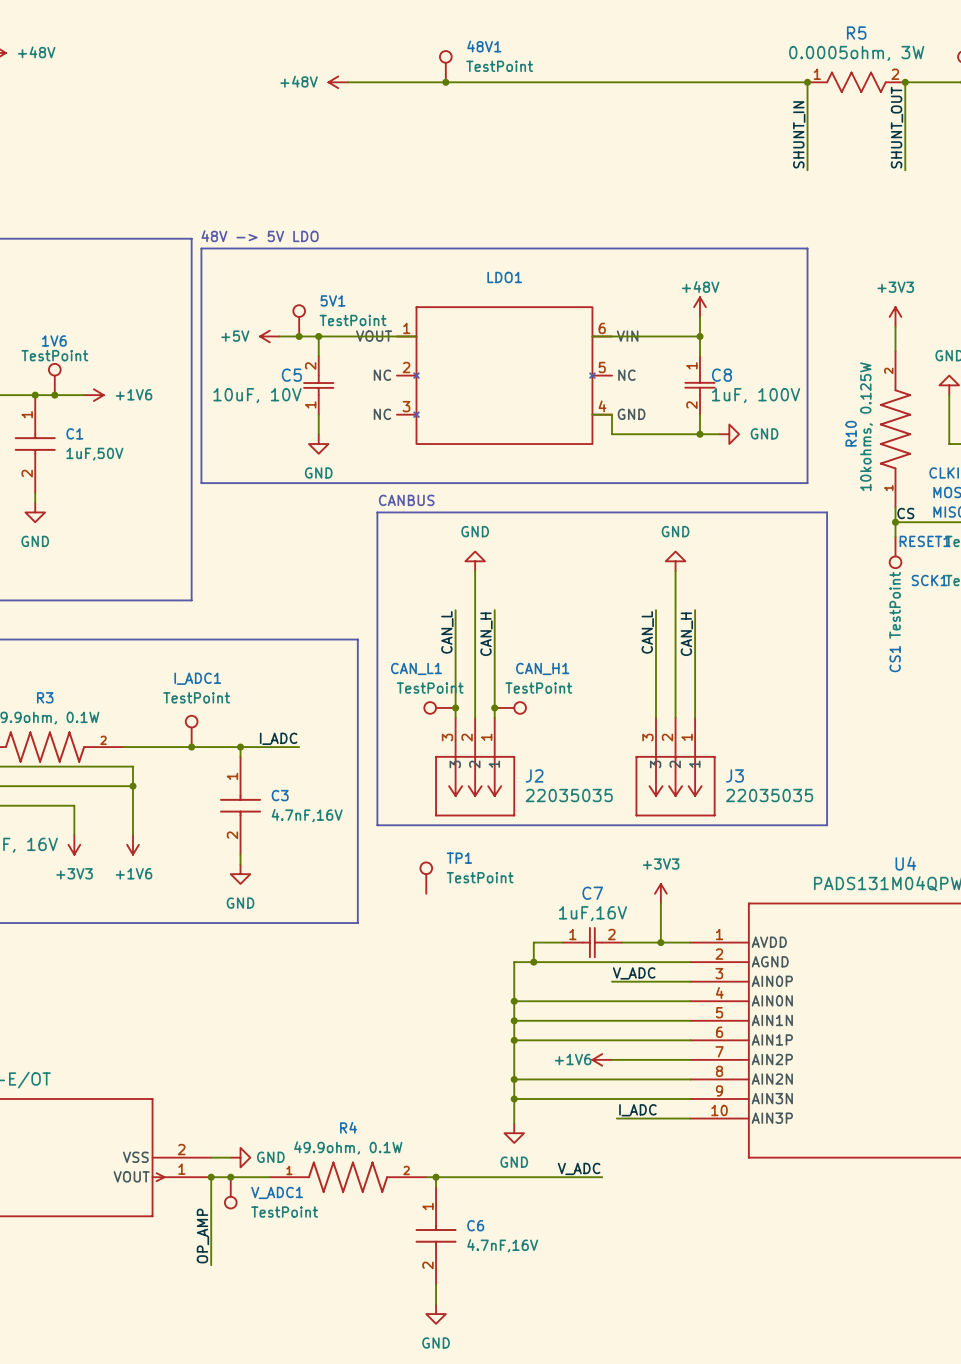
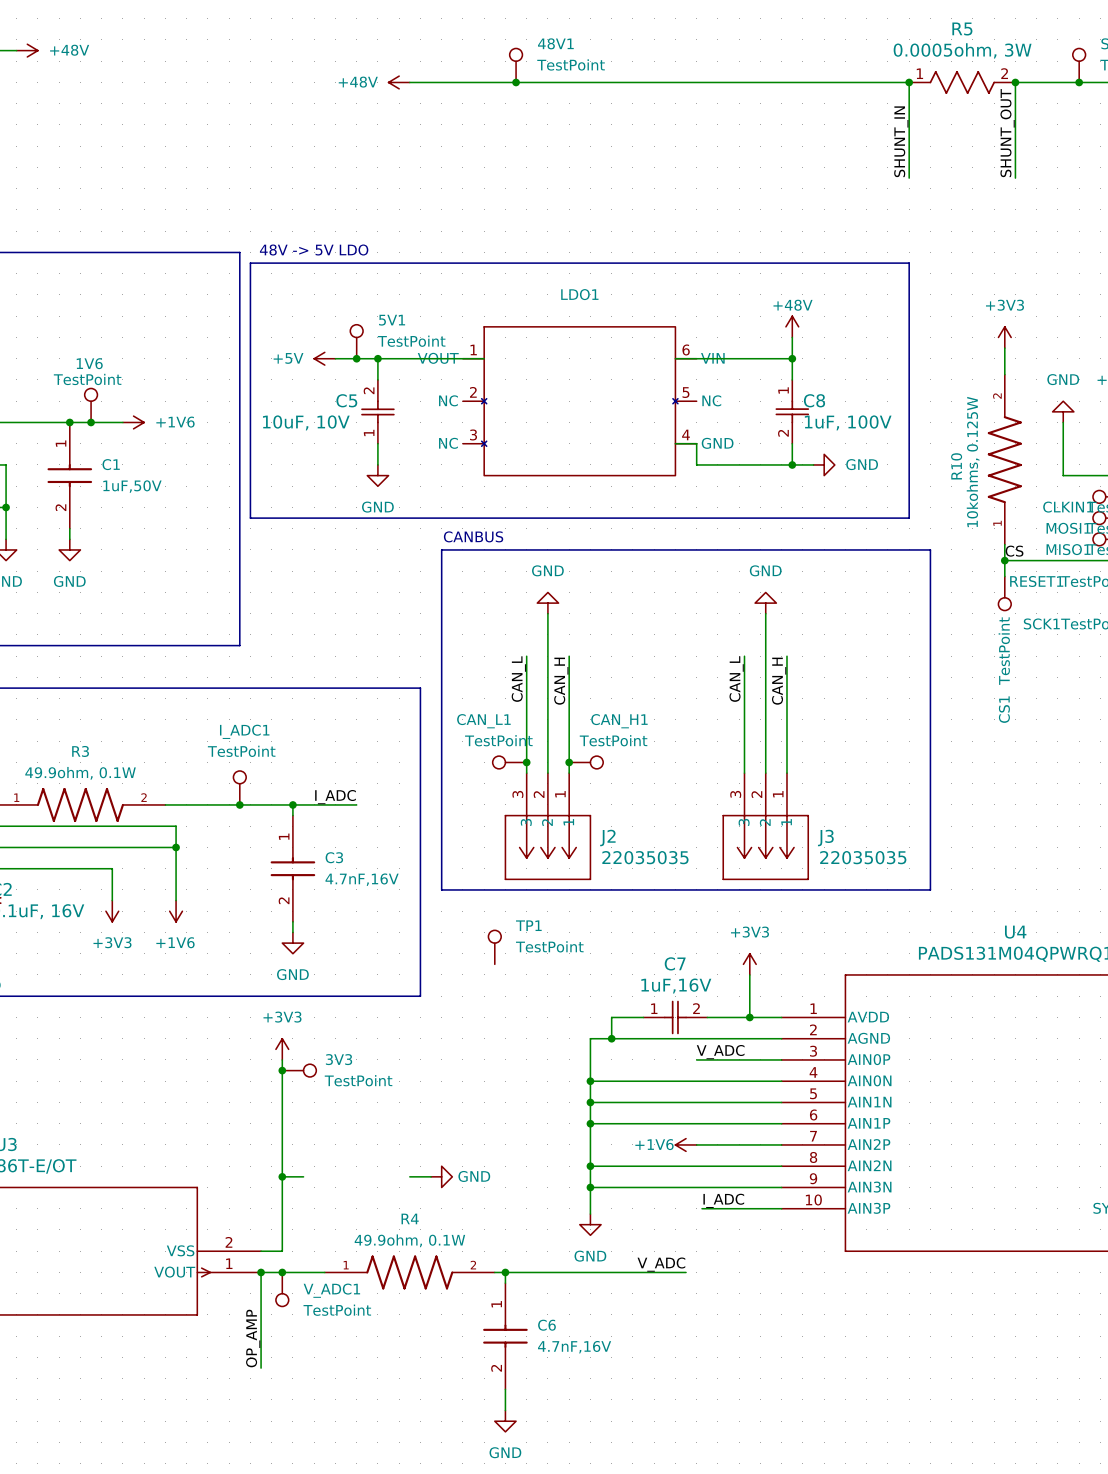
power symbol: none -> +3V3 (282, 1049)
wire: none -> (282, 1059) (282, 1251)
junction: none -> (282, 1070)
3V3: none -> TestPoint (299, 1070)
wire: none -> (282, 1176) (303, 1176)
junction: none -> (282, 1176)
wire: none -> (409, 1176) (431, 1176)
power symbol position: GND (240, 1157) -> GND (441, 1176)

